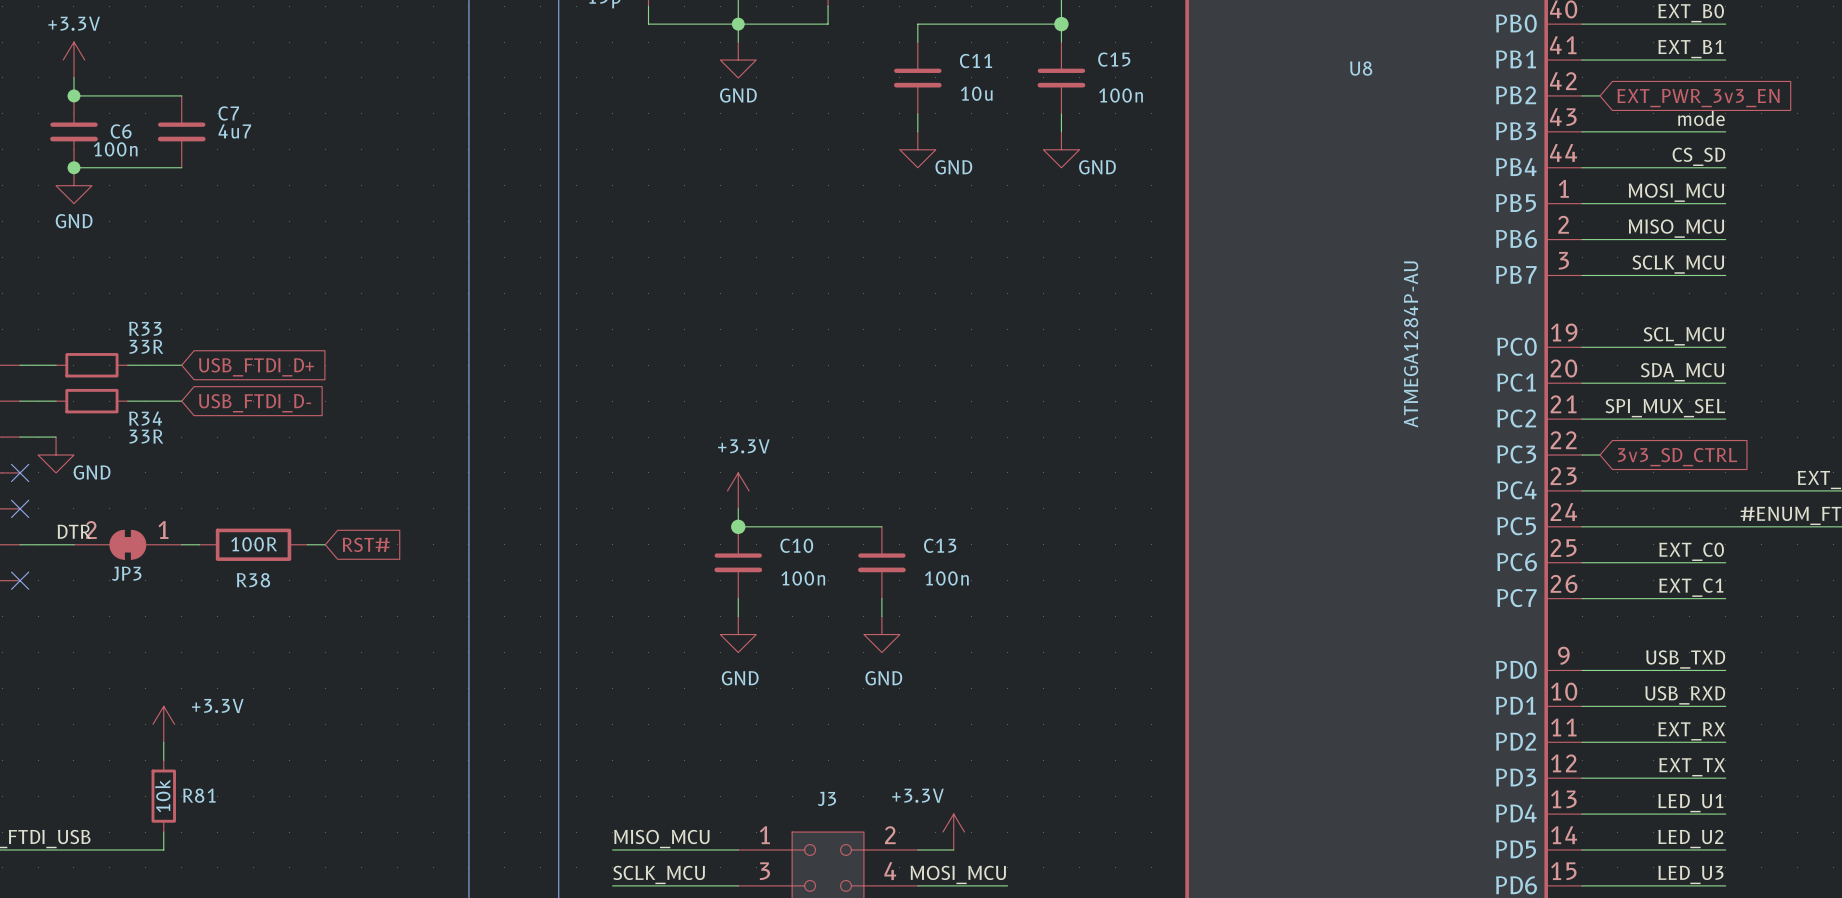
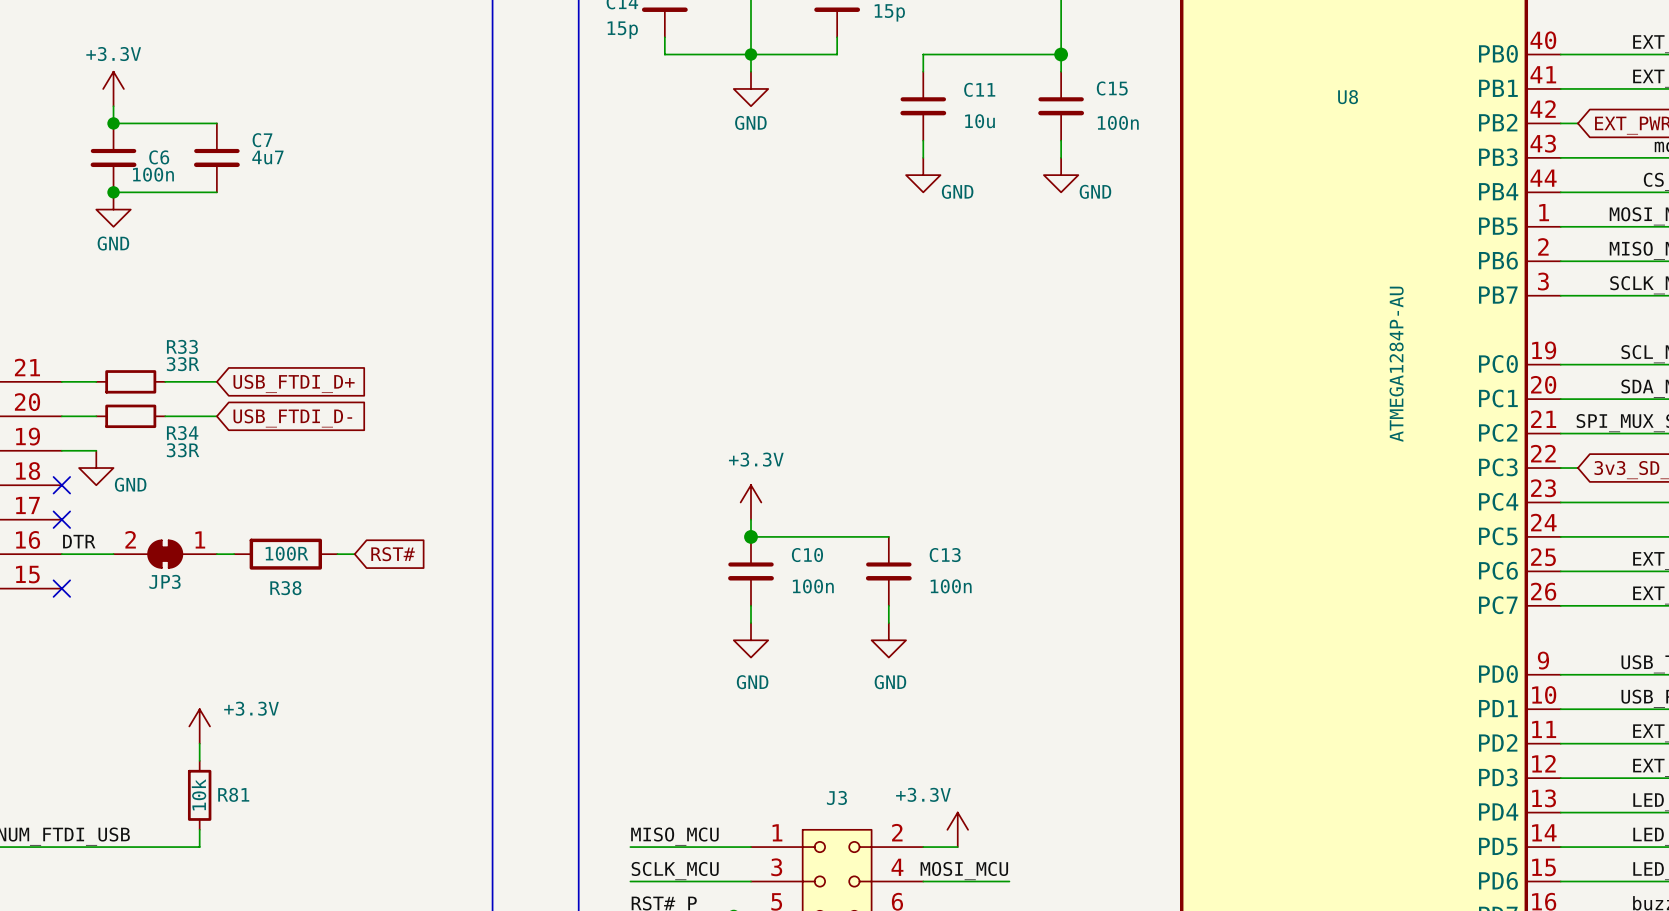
label position: DTR (74, 531) -> DTR (79, 541)

